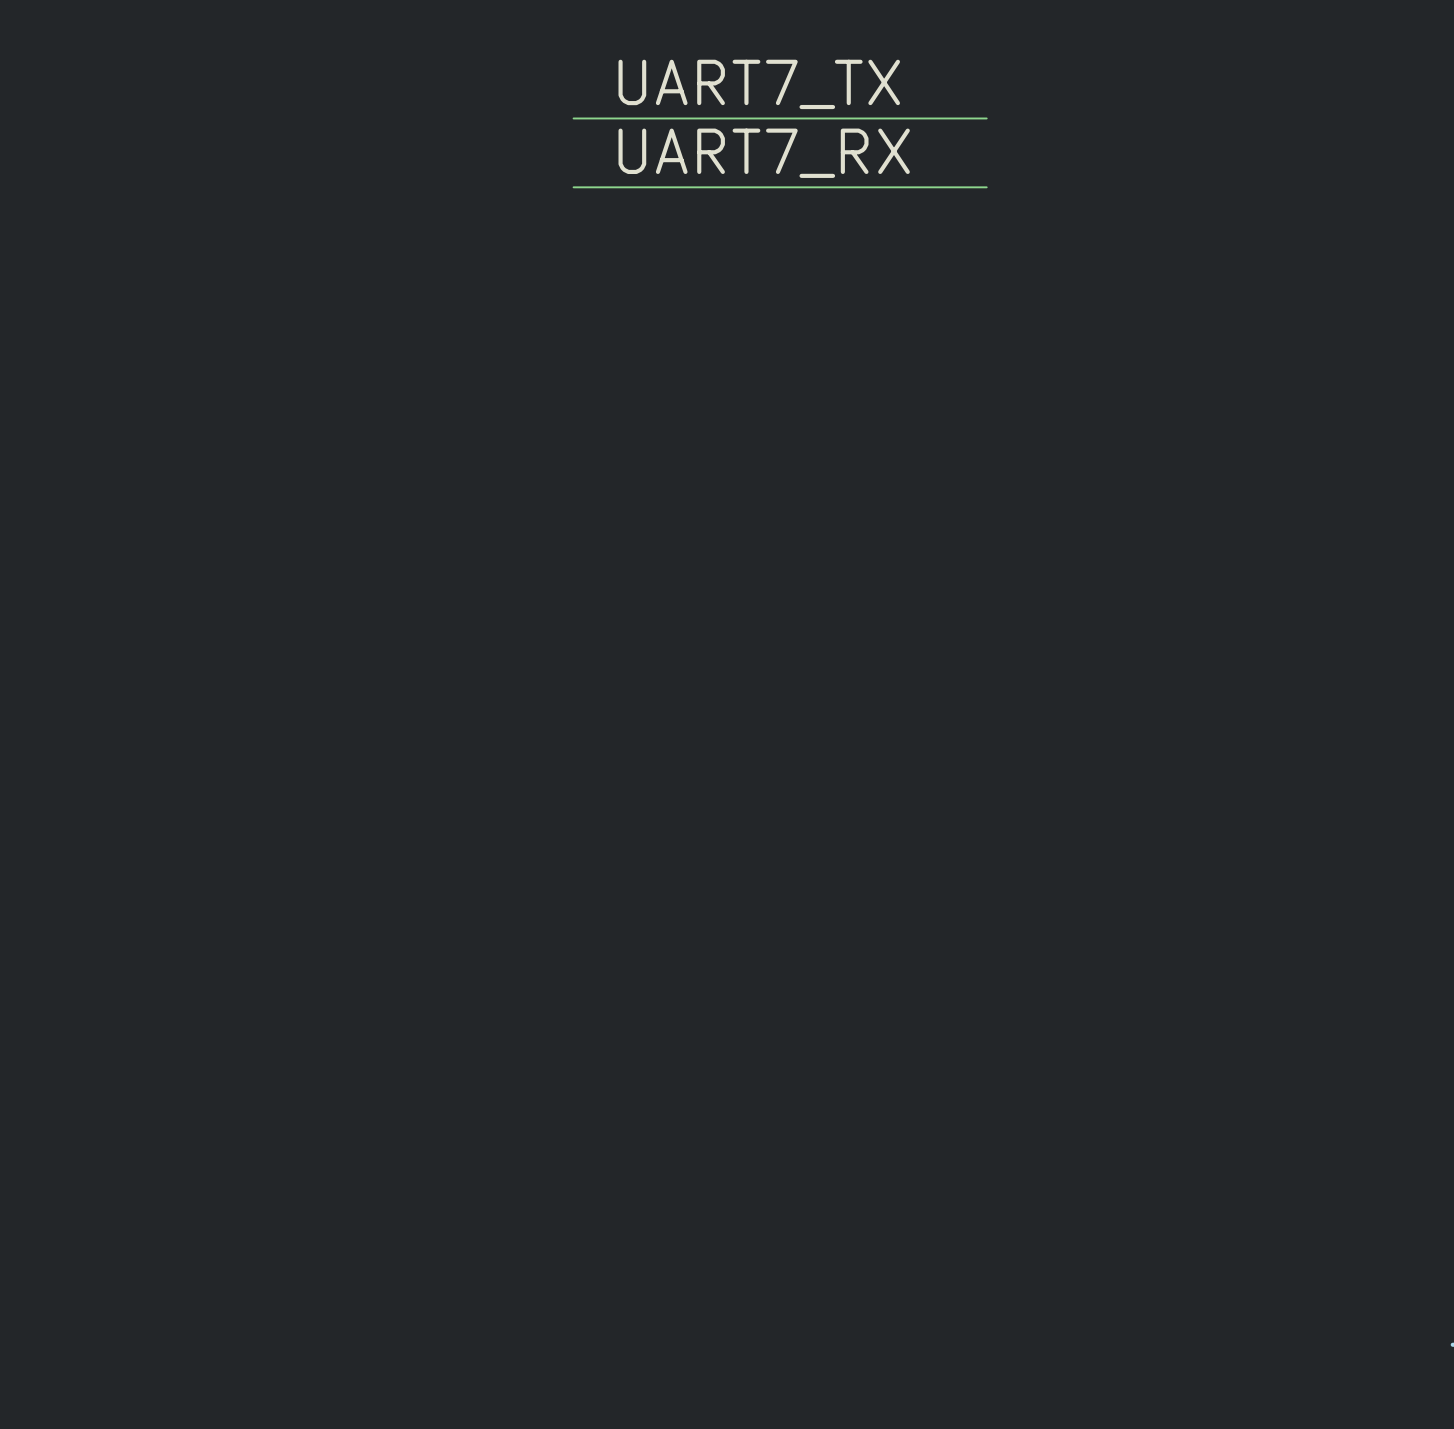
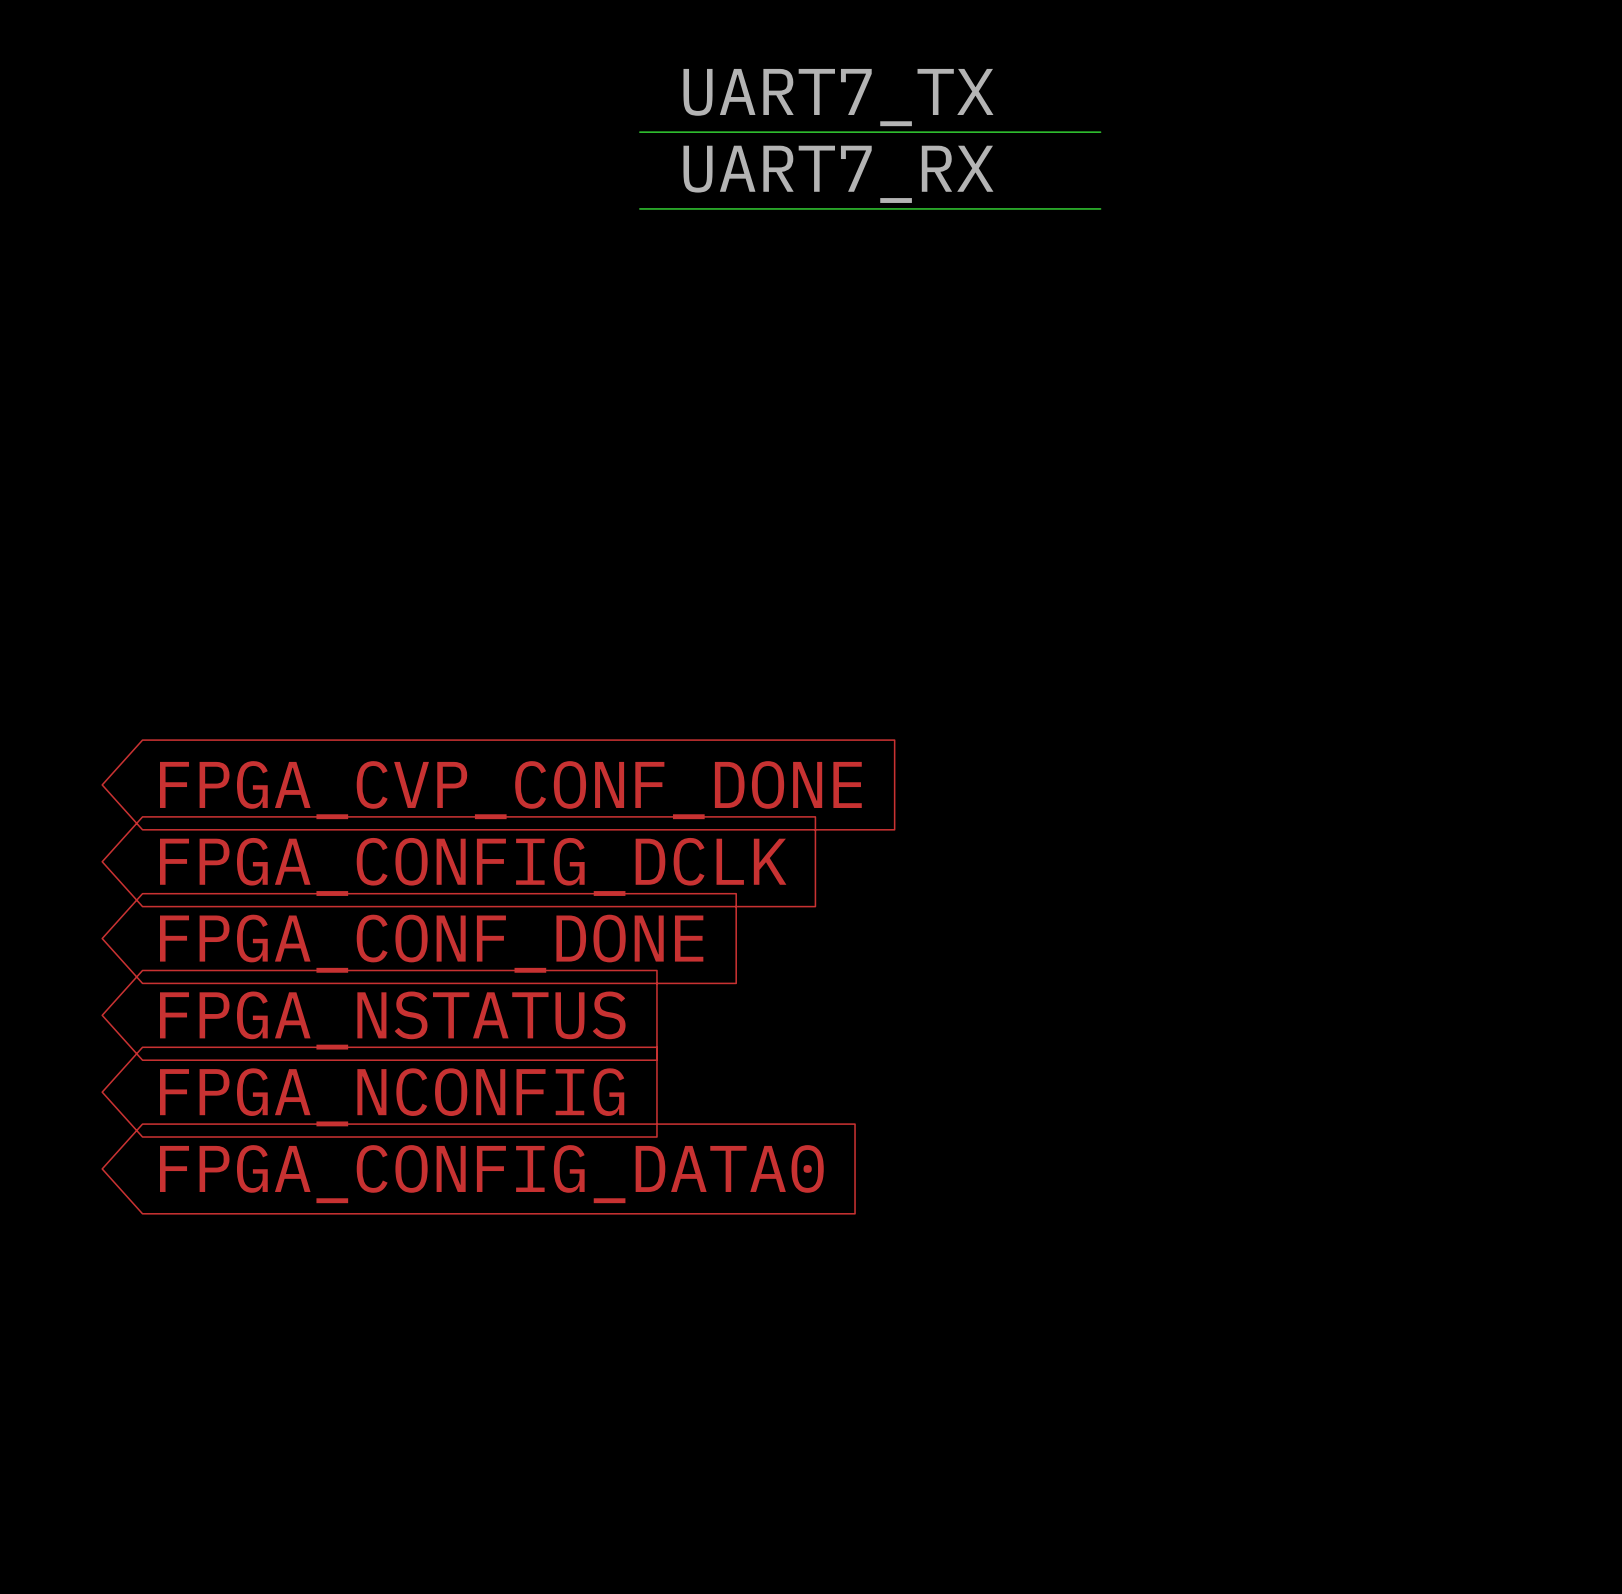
global label: none -> FPGA_CVP_CONF_DONE (510, 790)
global label: none -> FPGA_CONFIG_DCLK (473, 866)
global label: none -> FPGA_CONF_DONE (431, 943)
global label: none -> FPGA_NSTATUS (392, 1020)
global label: none -> FPGA_NCONFIG (392, 1097)
global label: none -> FPGA_CONFIG_DATA0 (491, 1174)

